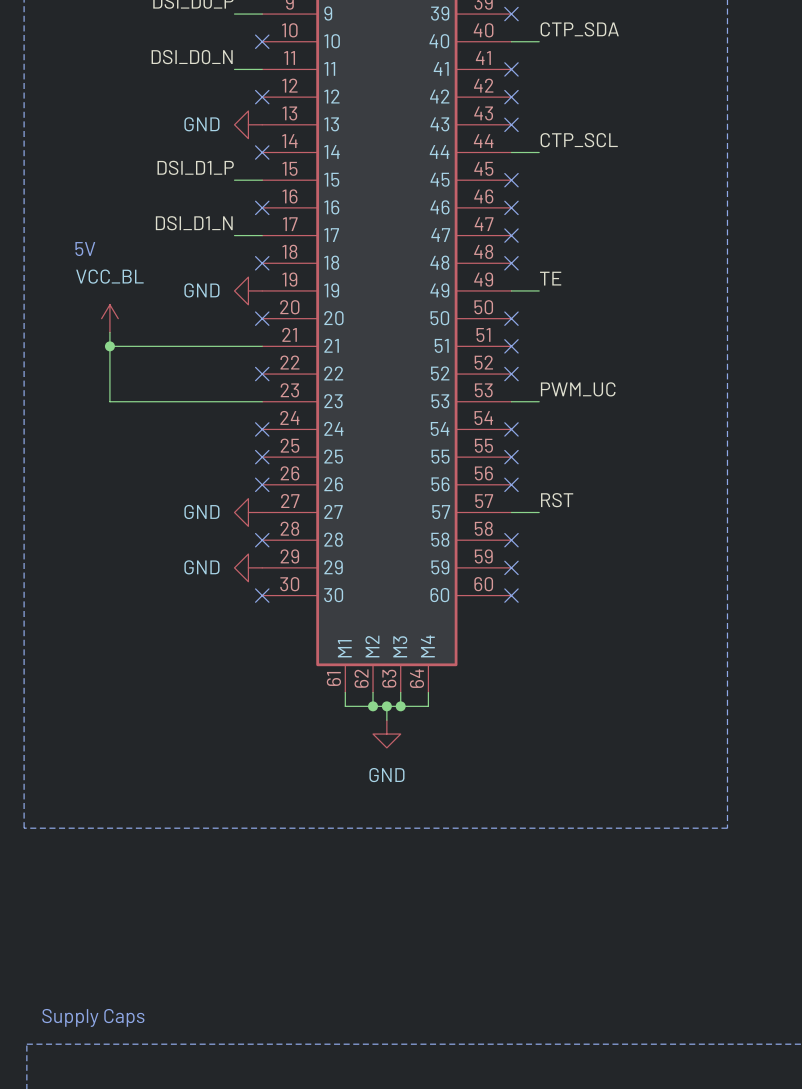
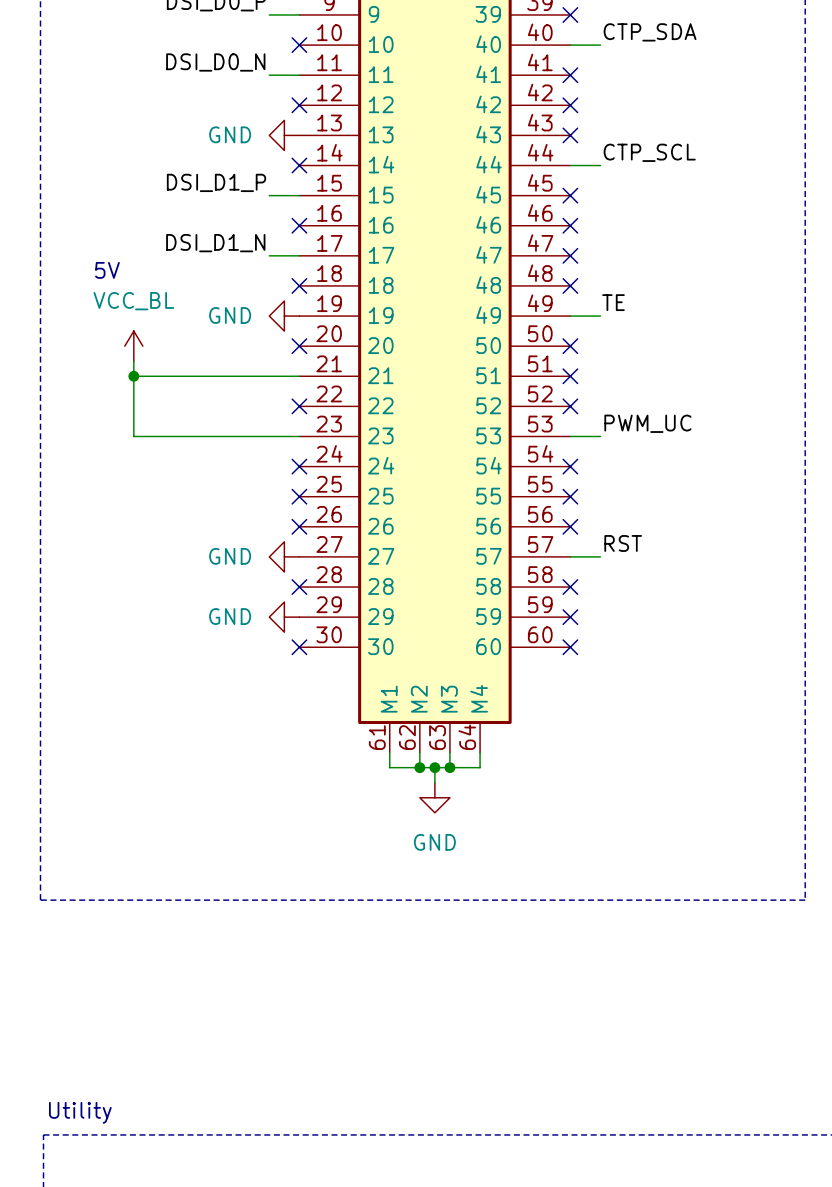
text: Supply Caps (93, 1017) -> none
text: none -> Utility (80, 1112)

